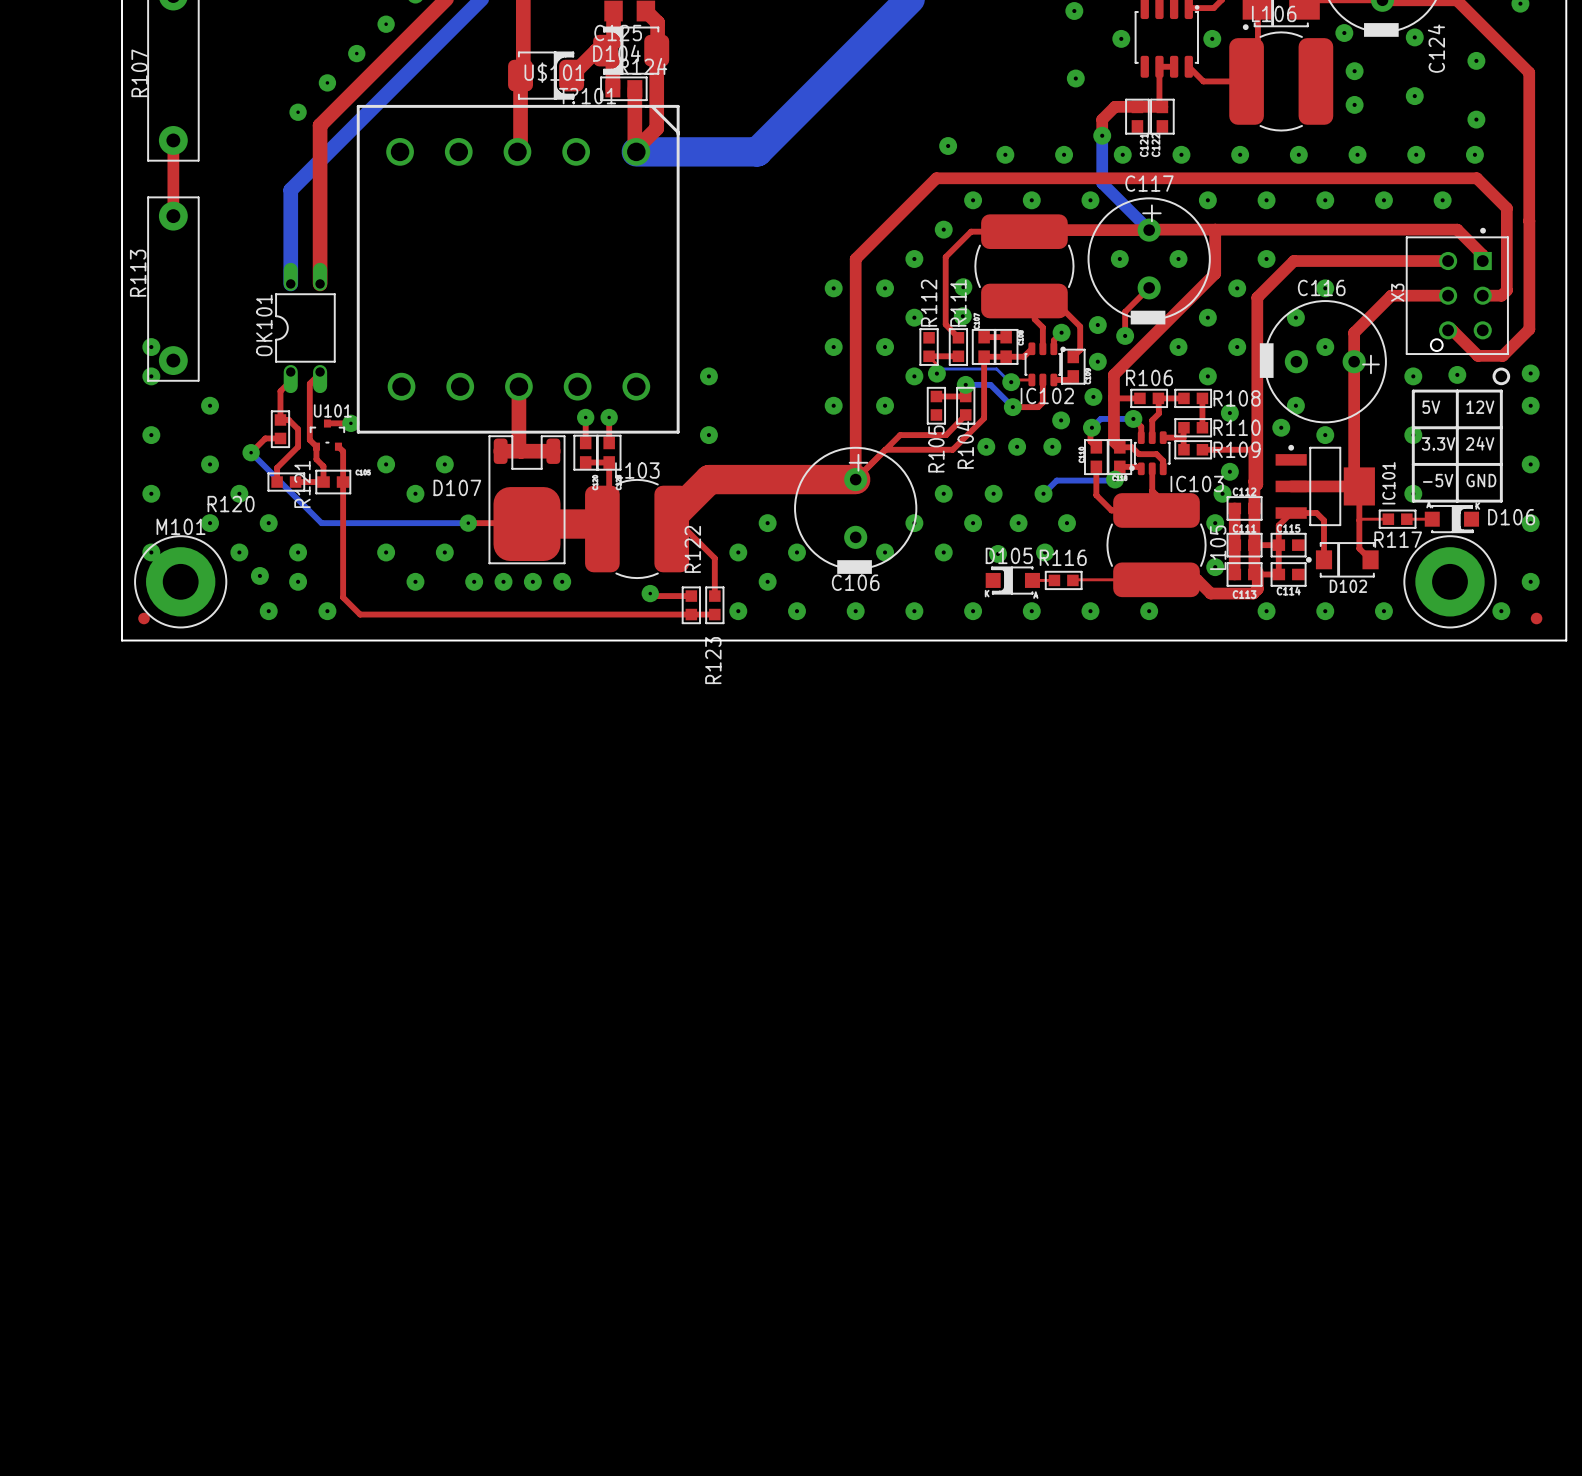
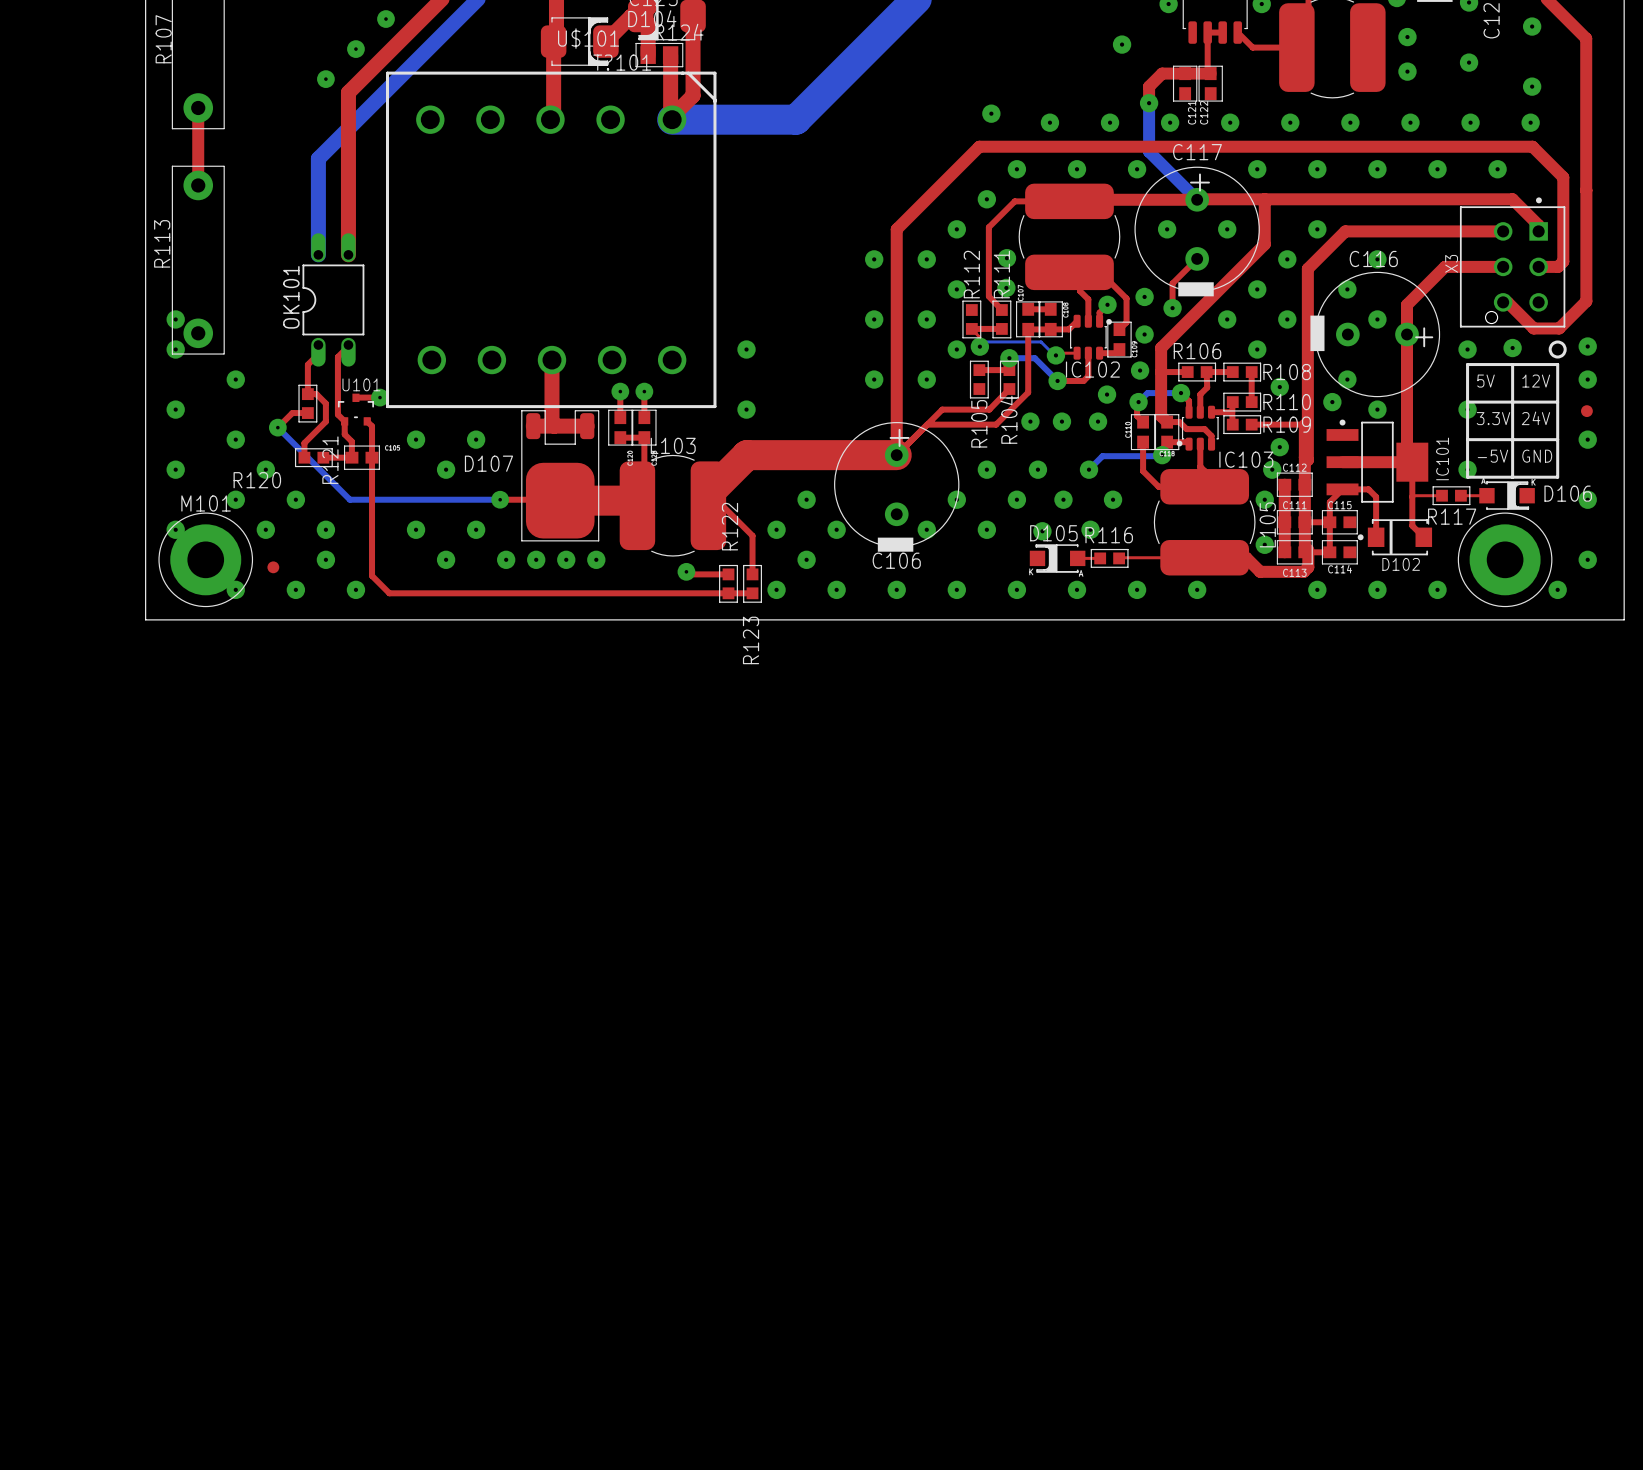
via position: (259, 575) -> (235, 589)
part position: (144, 618) -> (273, 567)
part position: (1536, 618) -> (1586, 411)

